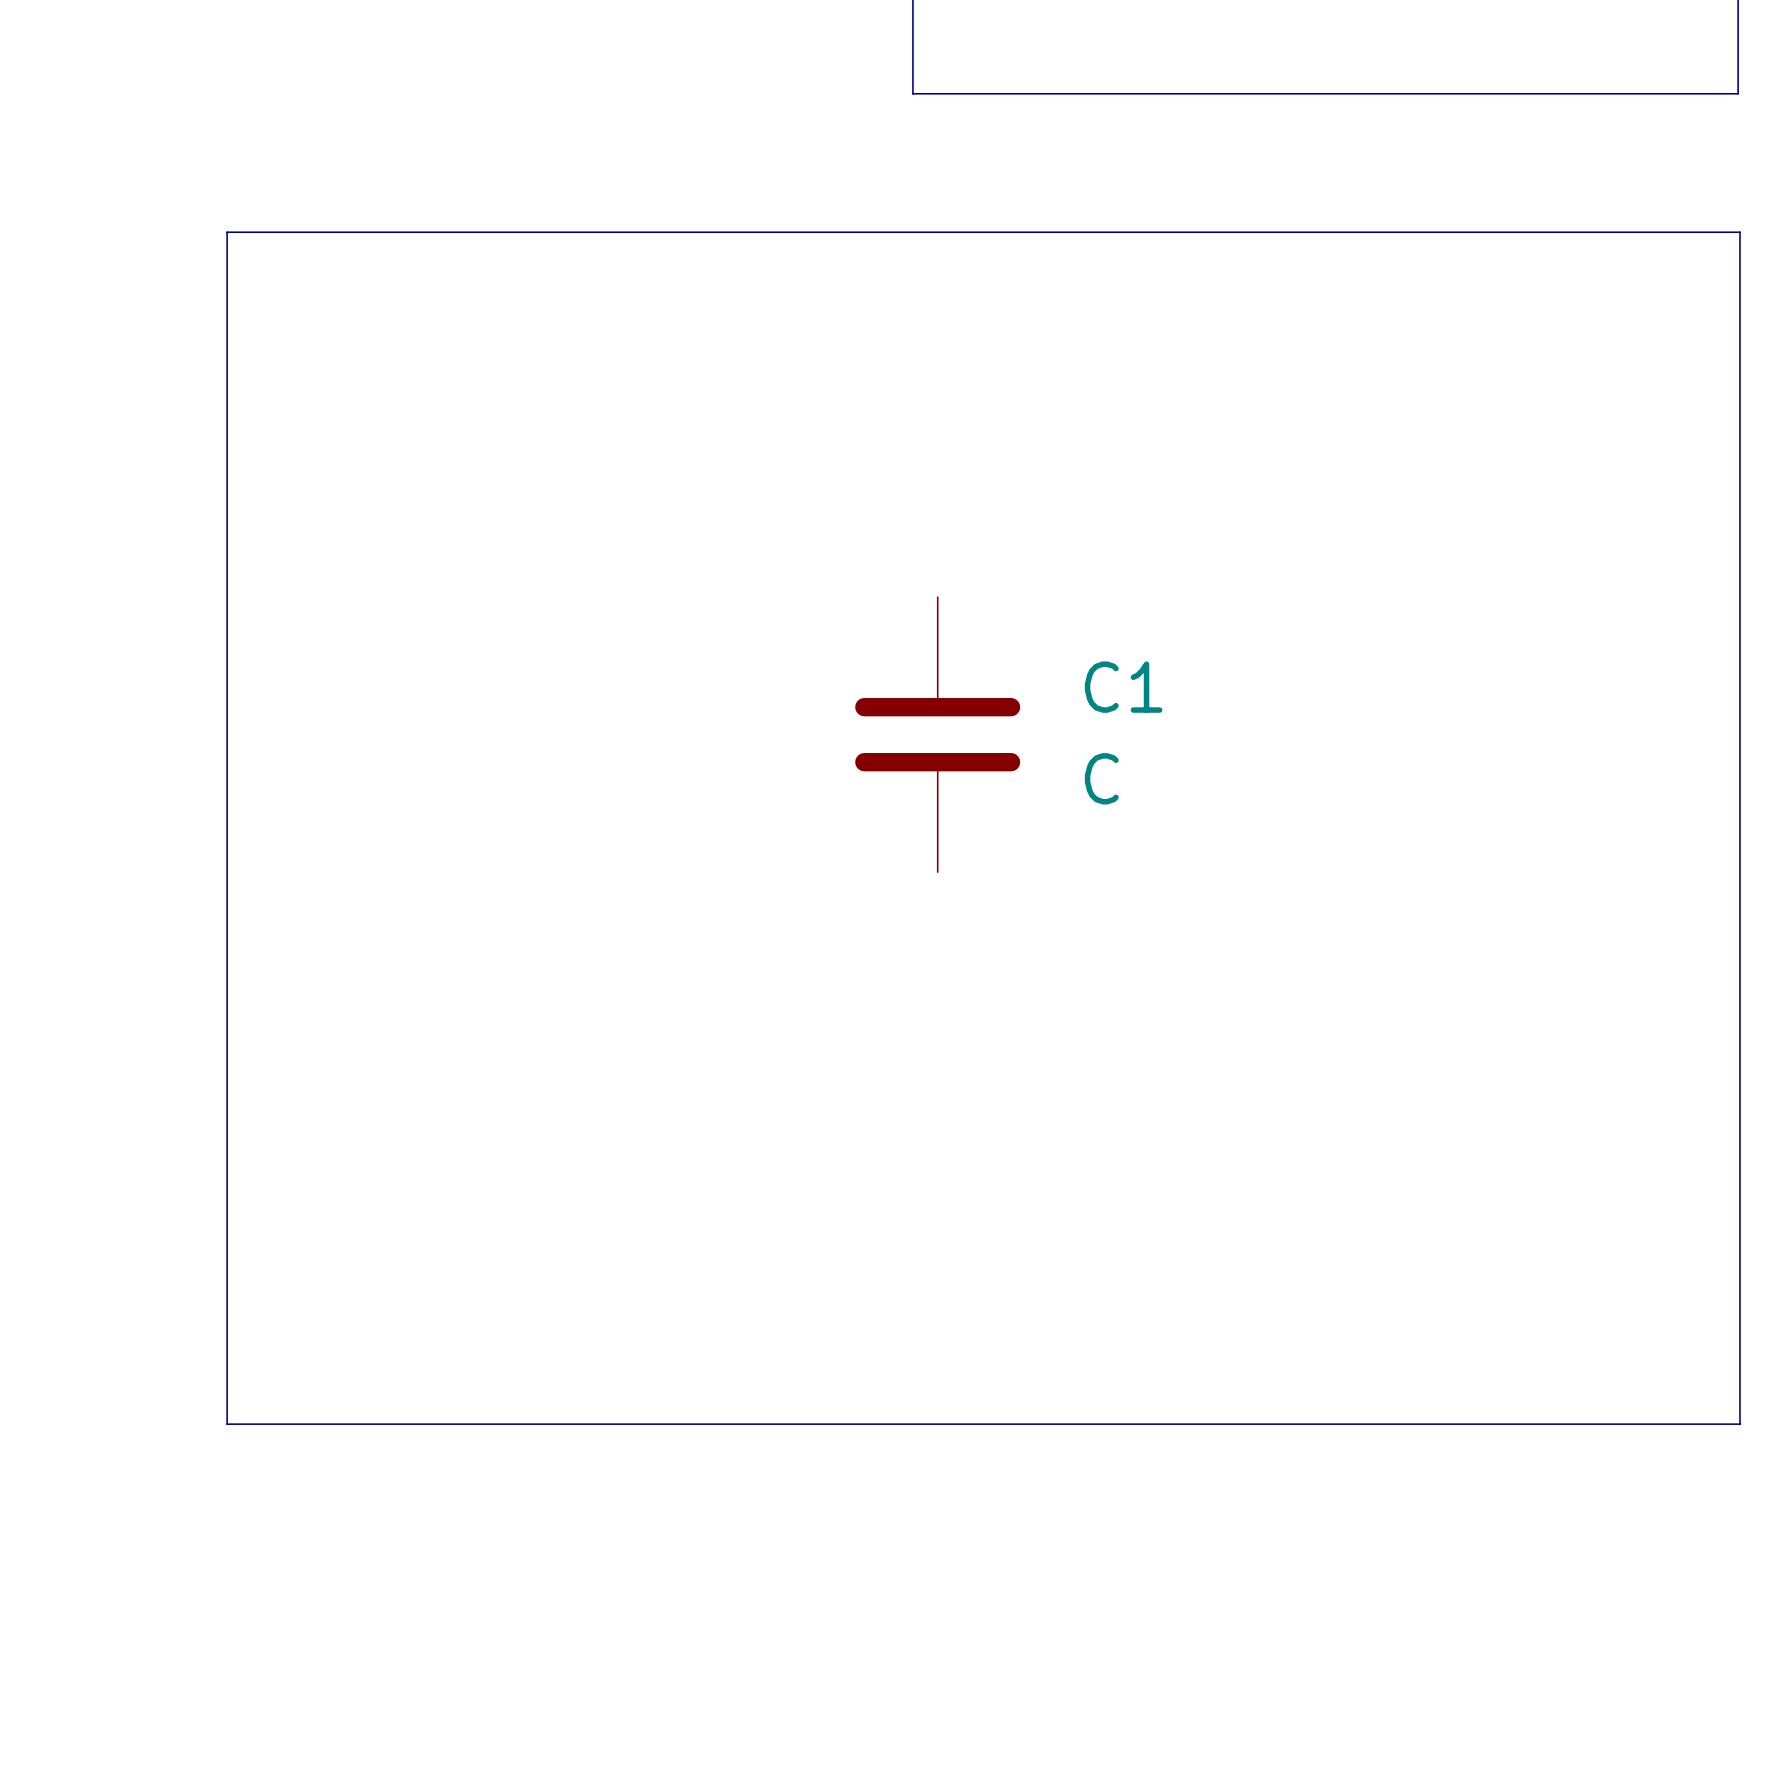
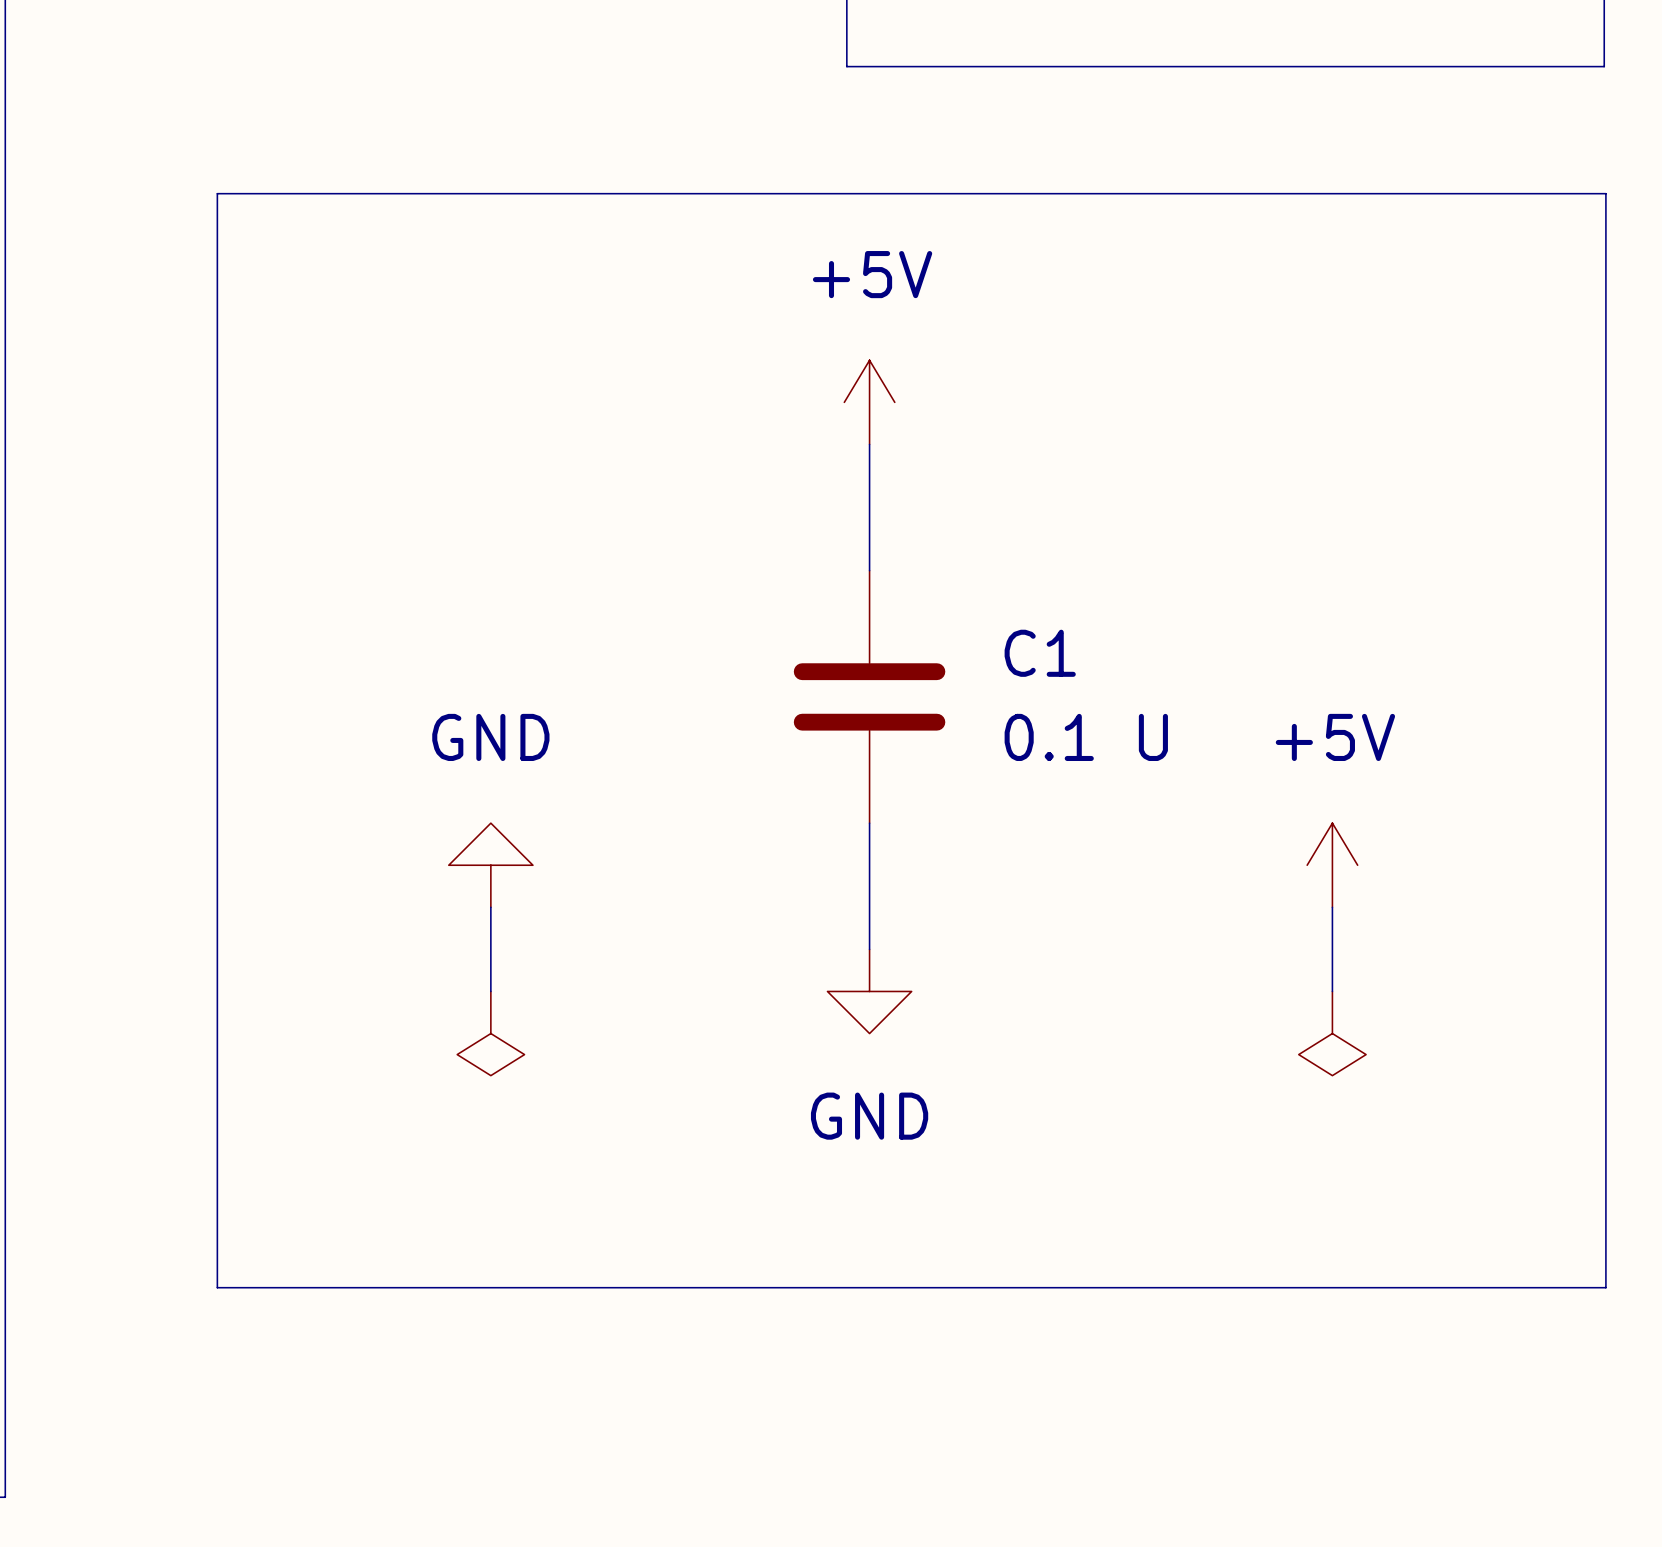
power symbol: none -> +5V (869, 402)
wire: none -> (869, 444) (869, 570)
C1 position: (937, 734) -> (869, 696)
C1 value: C (1101, 778) -> 0.1 U (1086, 737)
wire: none -> (869, 823) (869, 949)
power symbol: none -> GND (490, 865)
power symbol: none -> +5V (1332, 865)
wire: none -> (490, 907) (490, 991)
wire: none -> (1332, 907) (1332, 991)
power symbol: none -> GND (869, 991)
power symbol: none -> (490, 1033)
power symbol: none -> (1332, 1033)

